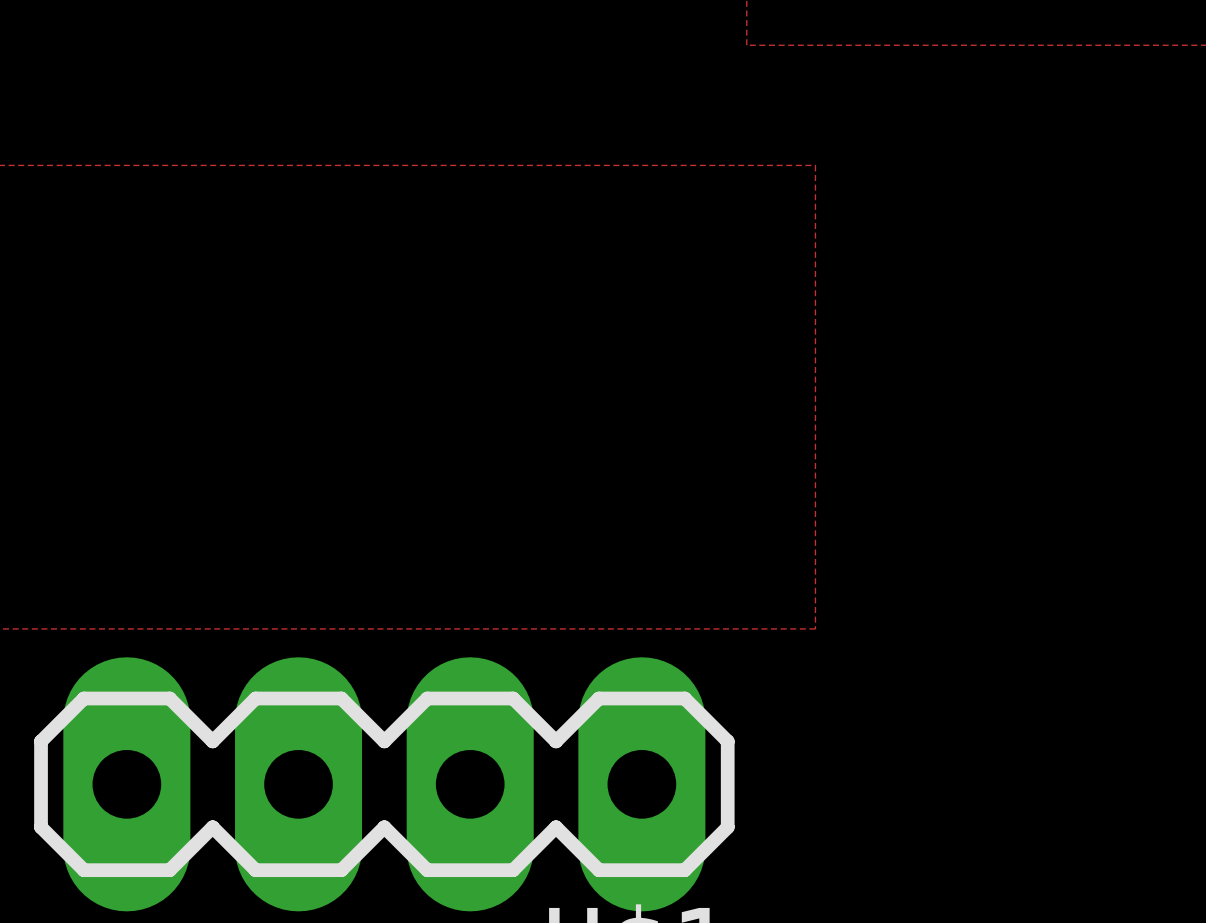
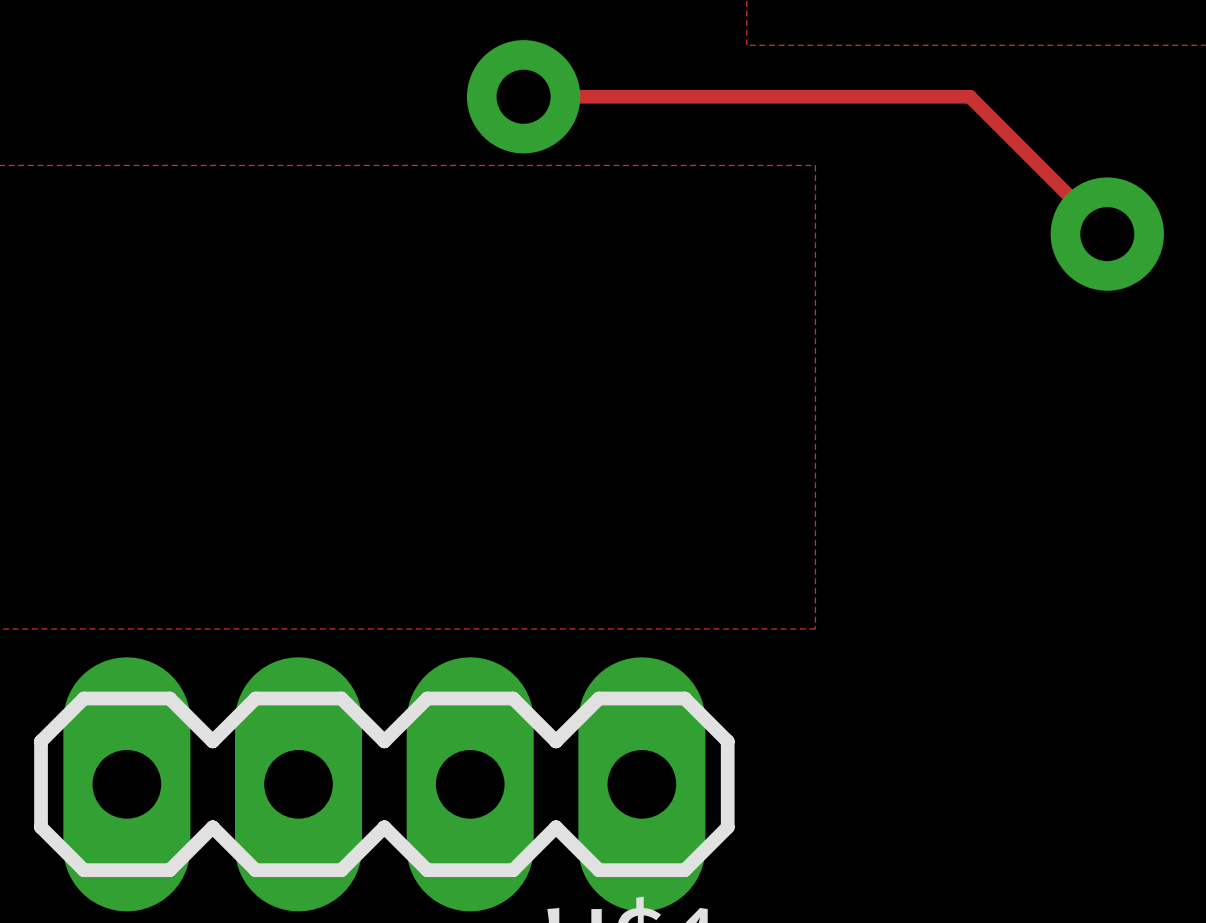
track: none -> (523, 96) (969, 96) (1107, 234)
via: none -> (523, 96)
via: none -> (1107, 234)

